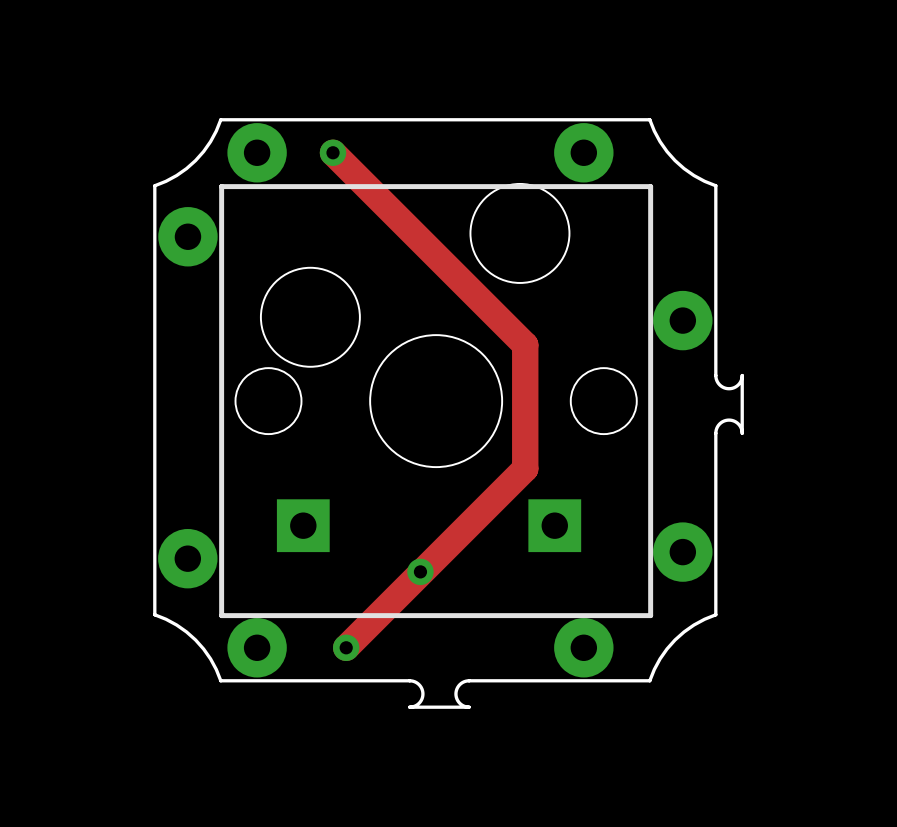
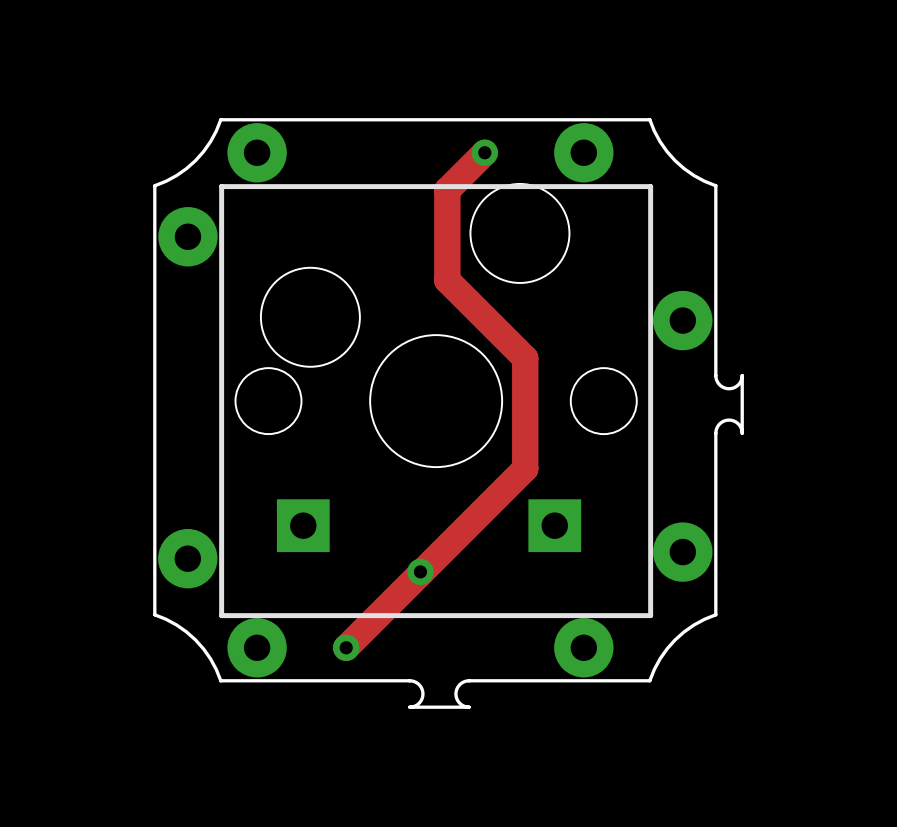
track: (333, 152) (525, 345) (525, 358) -> (484, 152) (447, 190) (447, 280) (525, 358)
via position: (333, 152) -> (484, 152)

